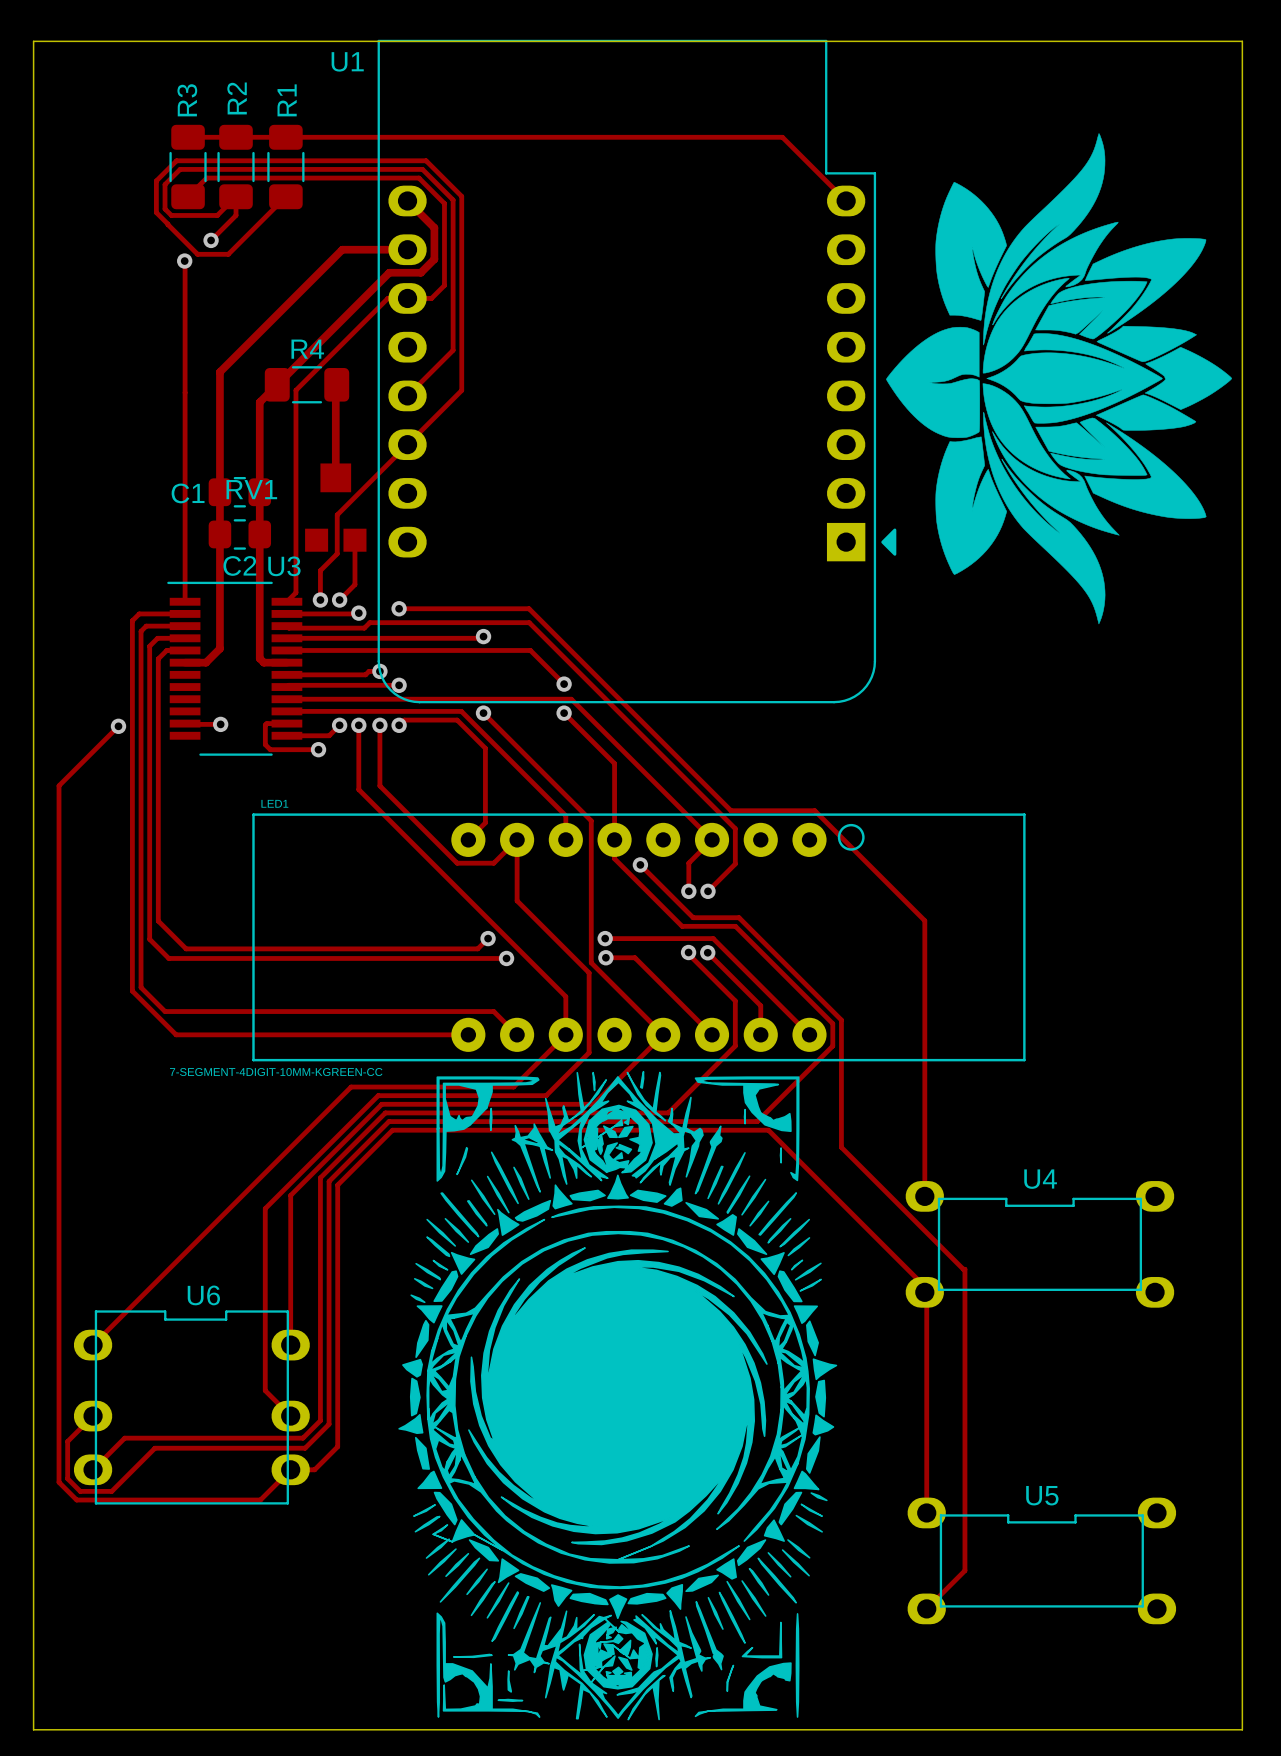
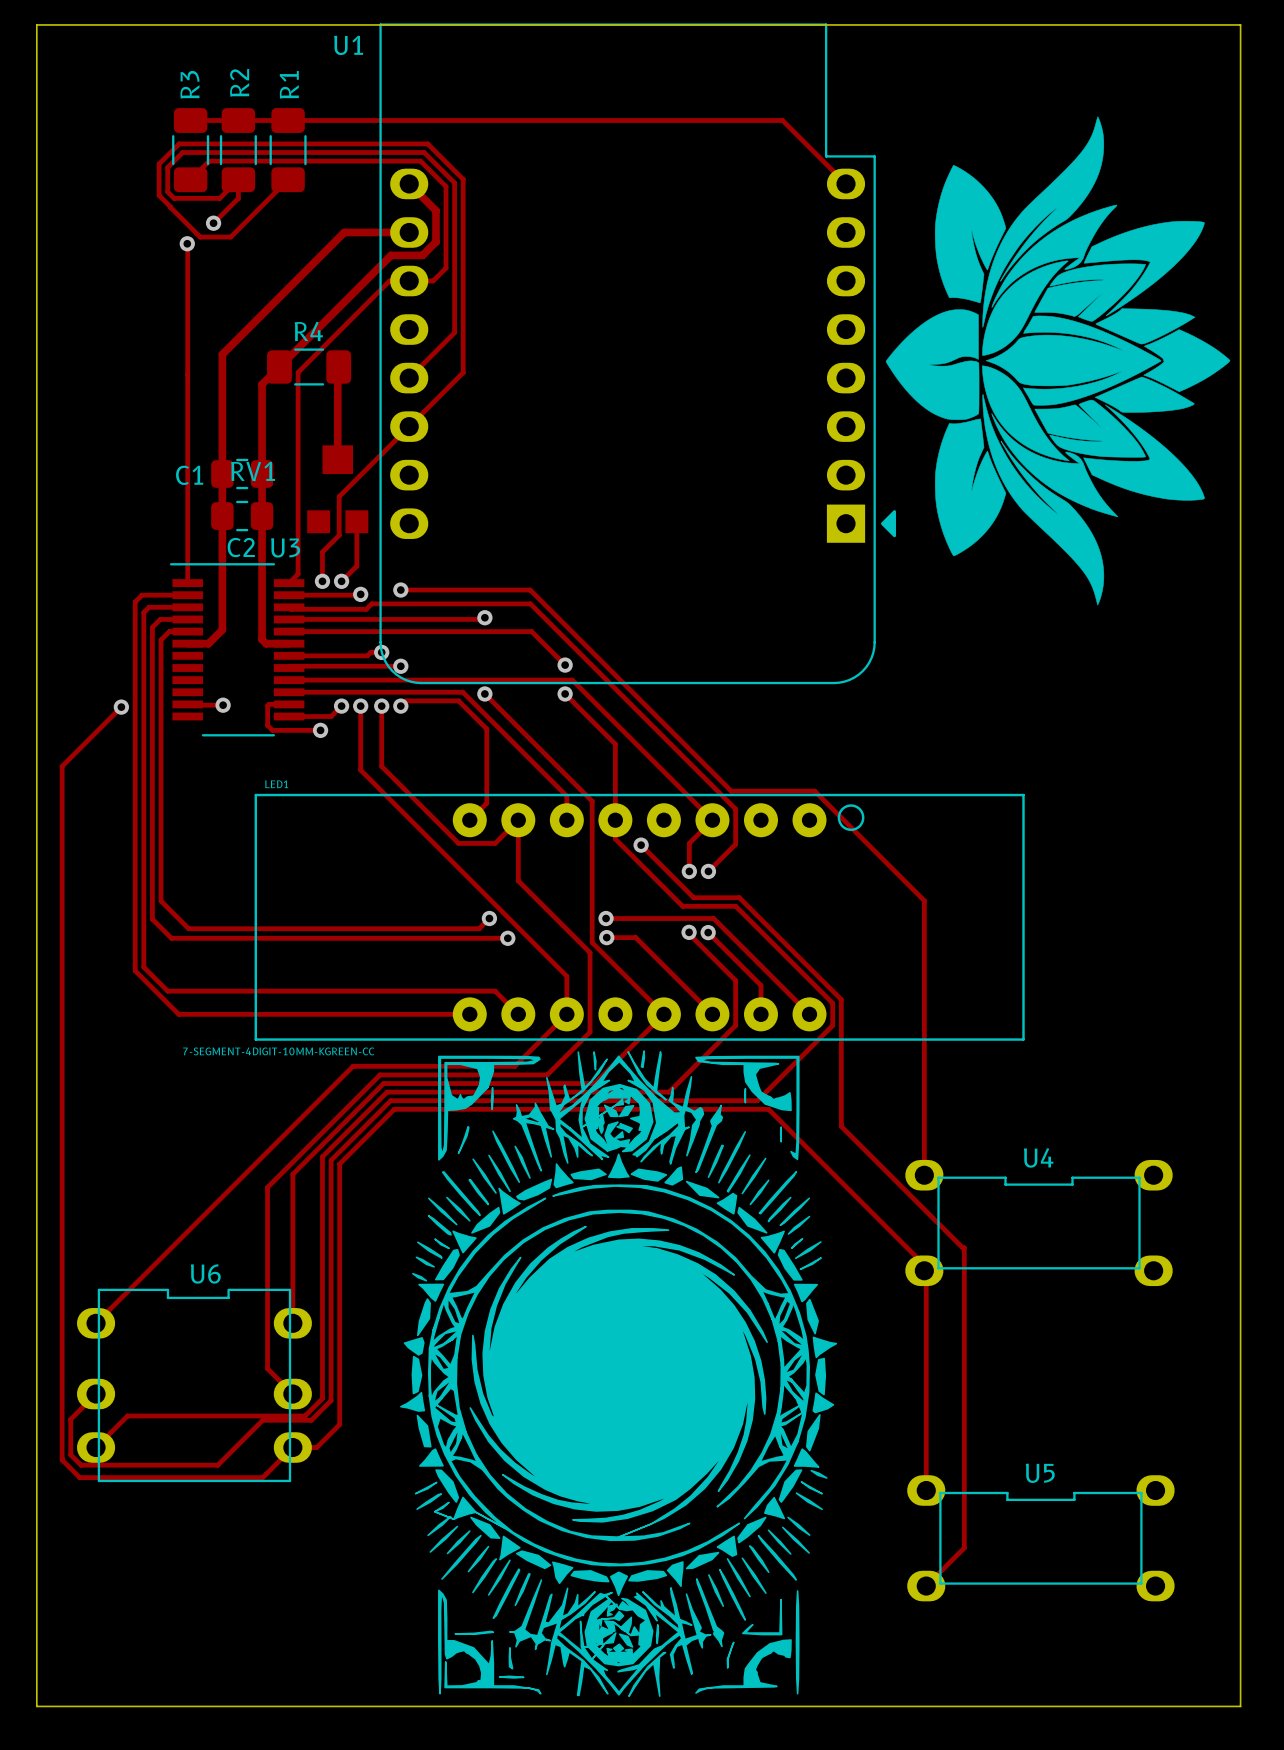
track: (329, 1422) (305, 1448) (154, 1448) (111, 1491) (80, 1491) (67, 1477) -> (331, 1400) (311, 1420) (262, 1420) (217, 1465) (81, 1465) (70, 1454)

